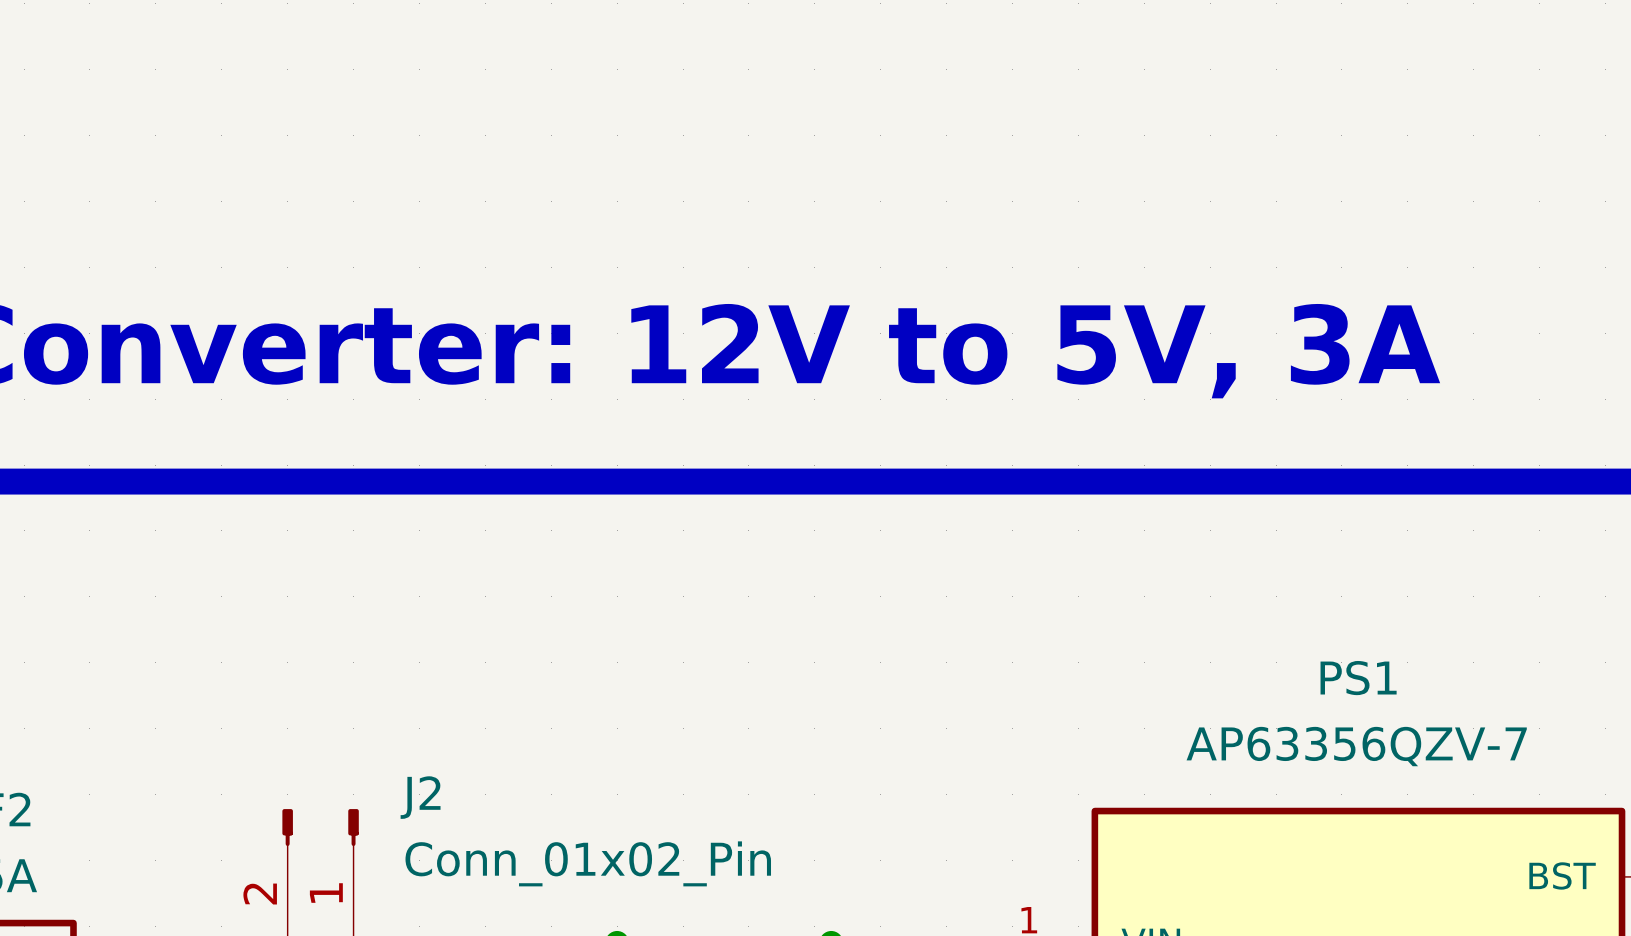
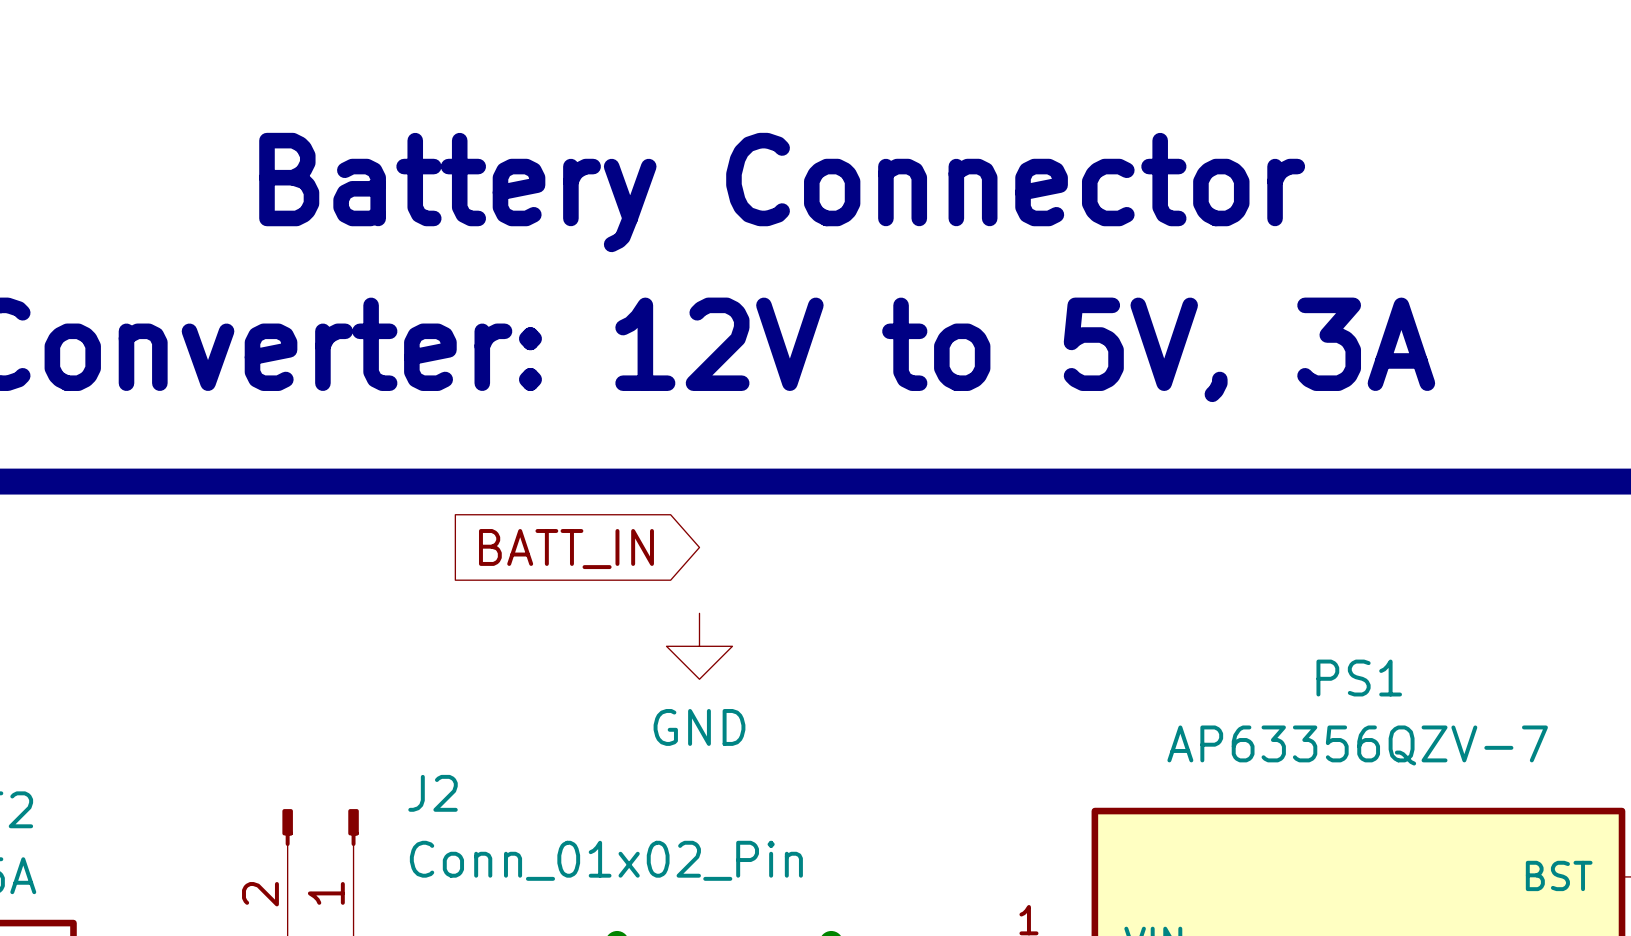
text: none -> Battery Connector (782, 192)
global label: none -> BATT_IN (566, 549)
power symbol: none -> GND (699, 646)

